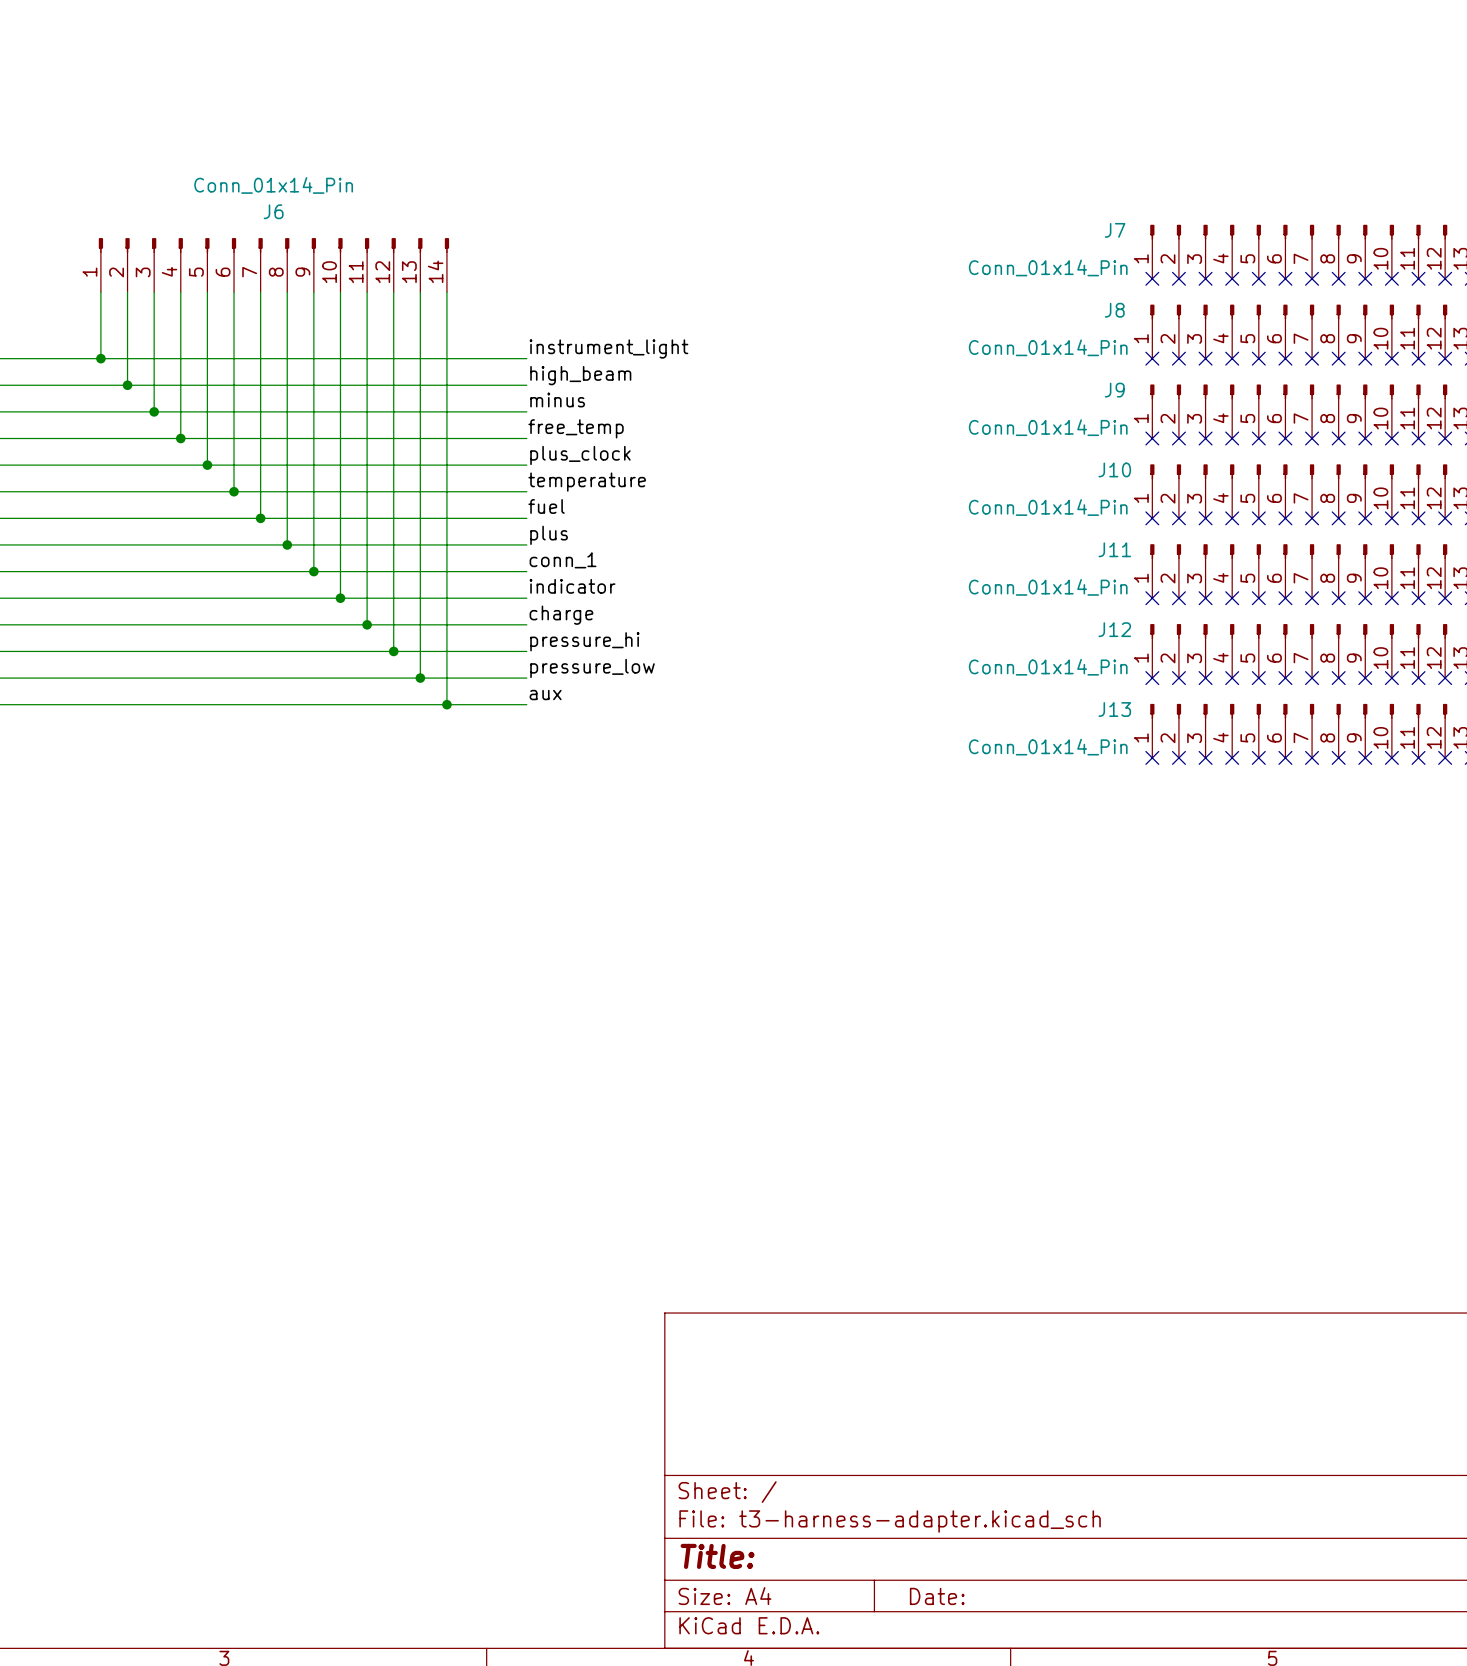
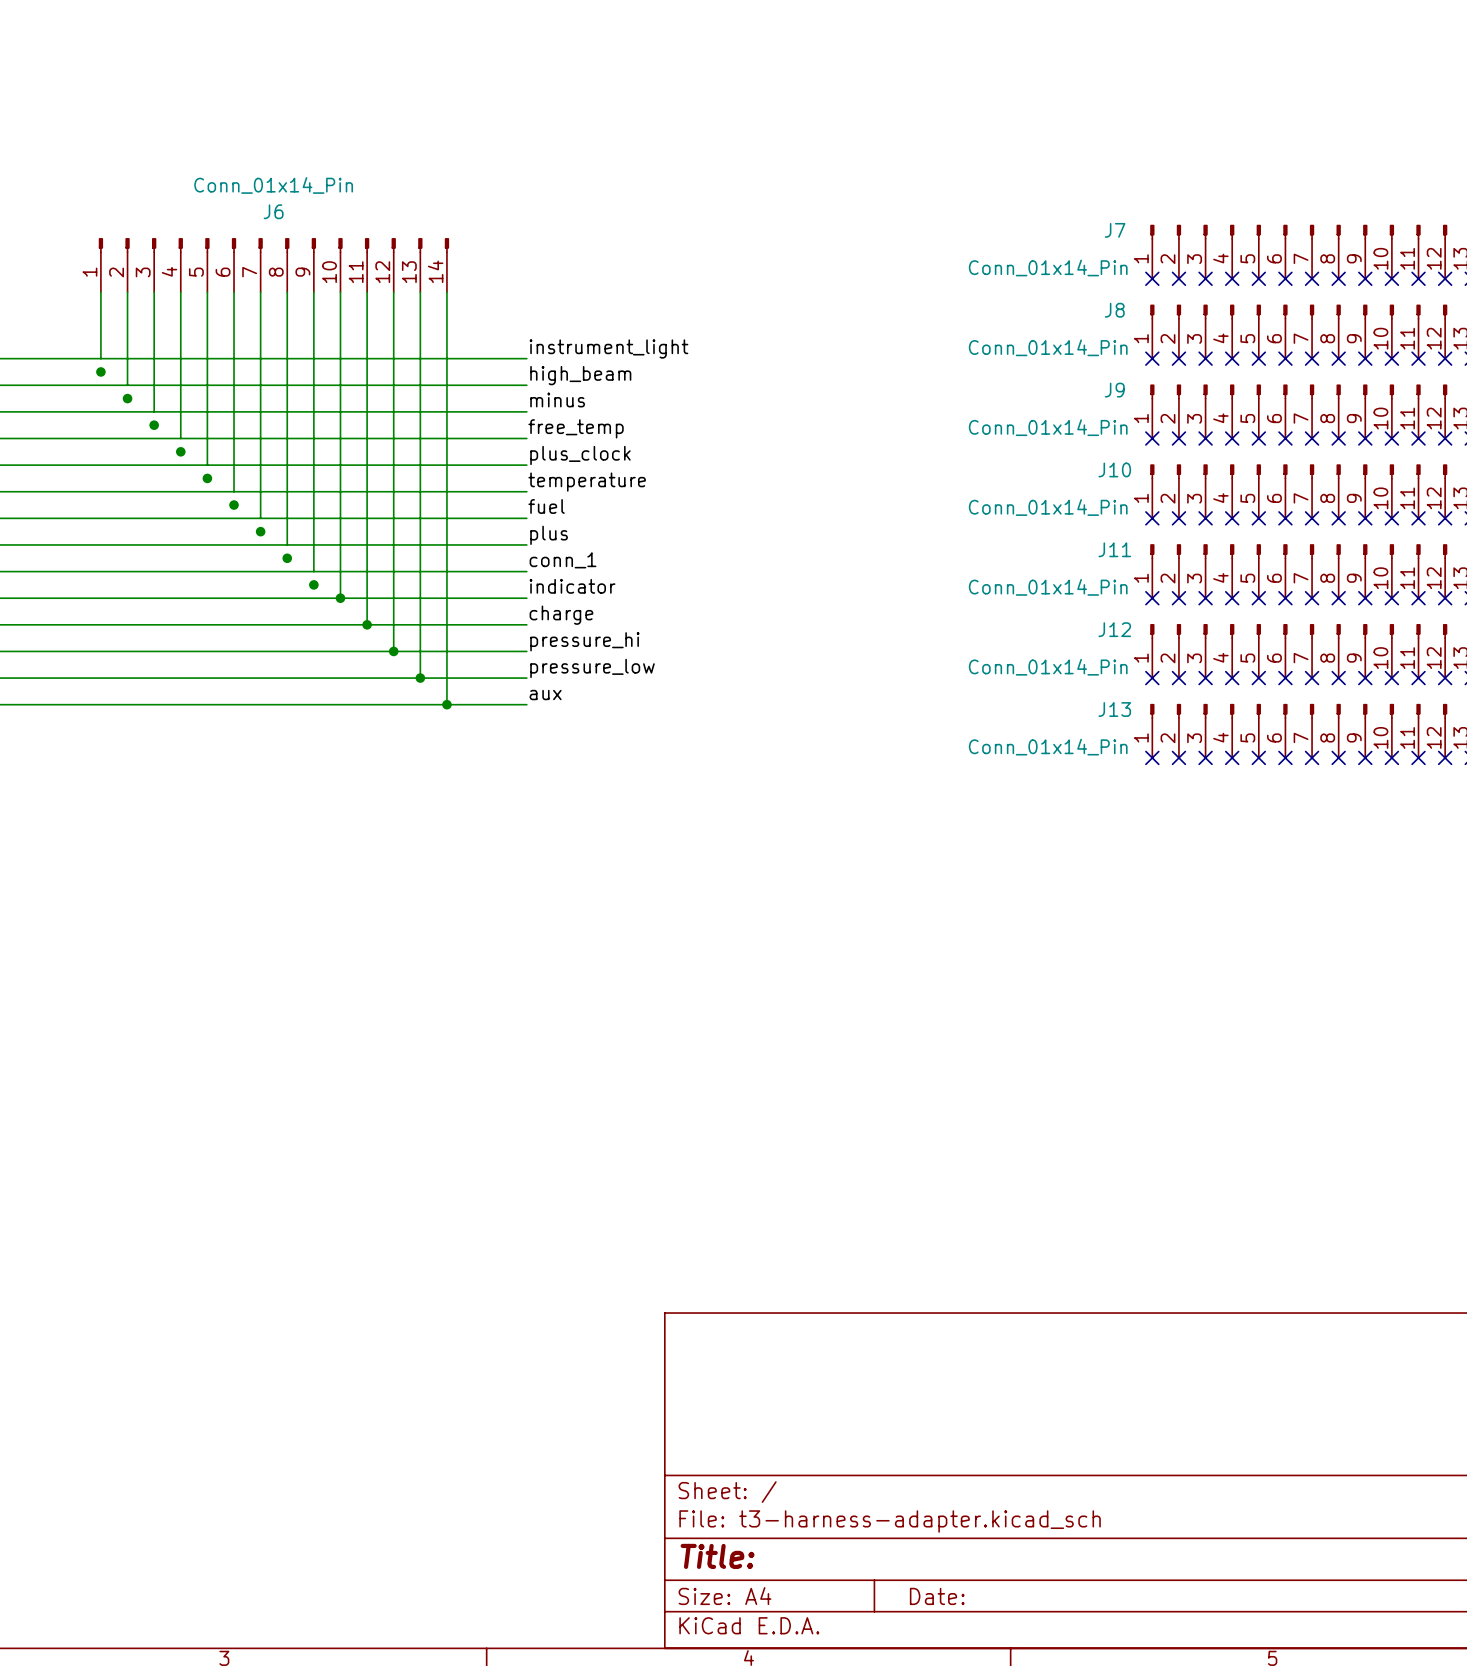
junction position: (100, 358) -> (100, 371)
junction position: (127, 385) -> (127, 398)
junction position: (154, 411) -> (154, 425)
junction position: (180, 438) -> (180, 451)
junction position: (207, 465) -> (207, 478)
junction position: (234, 491) -> (234, 505)
junction position: (260, 518) -> (260, 531)
junction position: (287, 544) -> (287, 558)
junction position: (313, 571) -> (313, 584)

